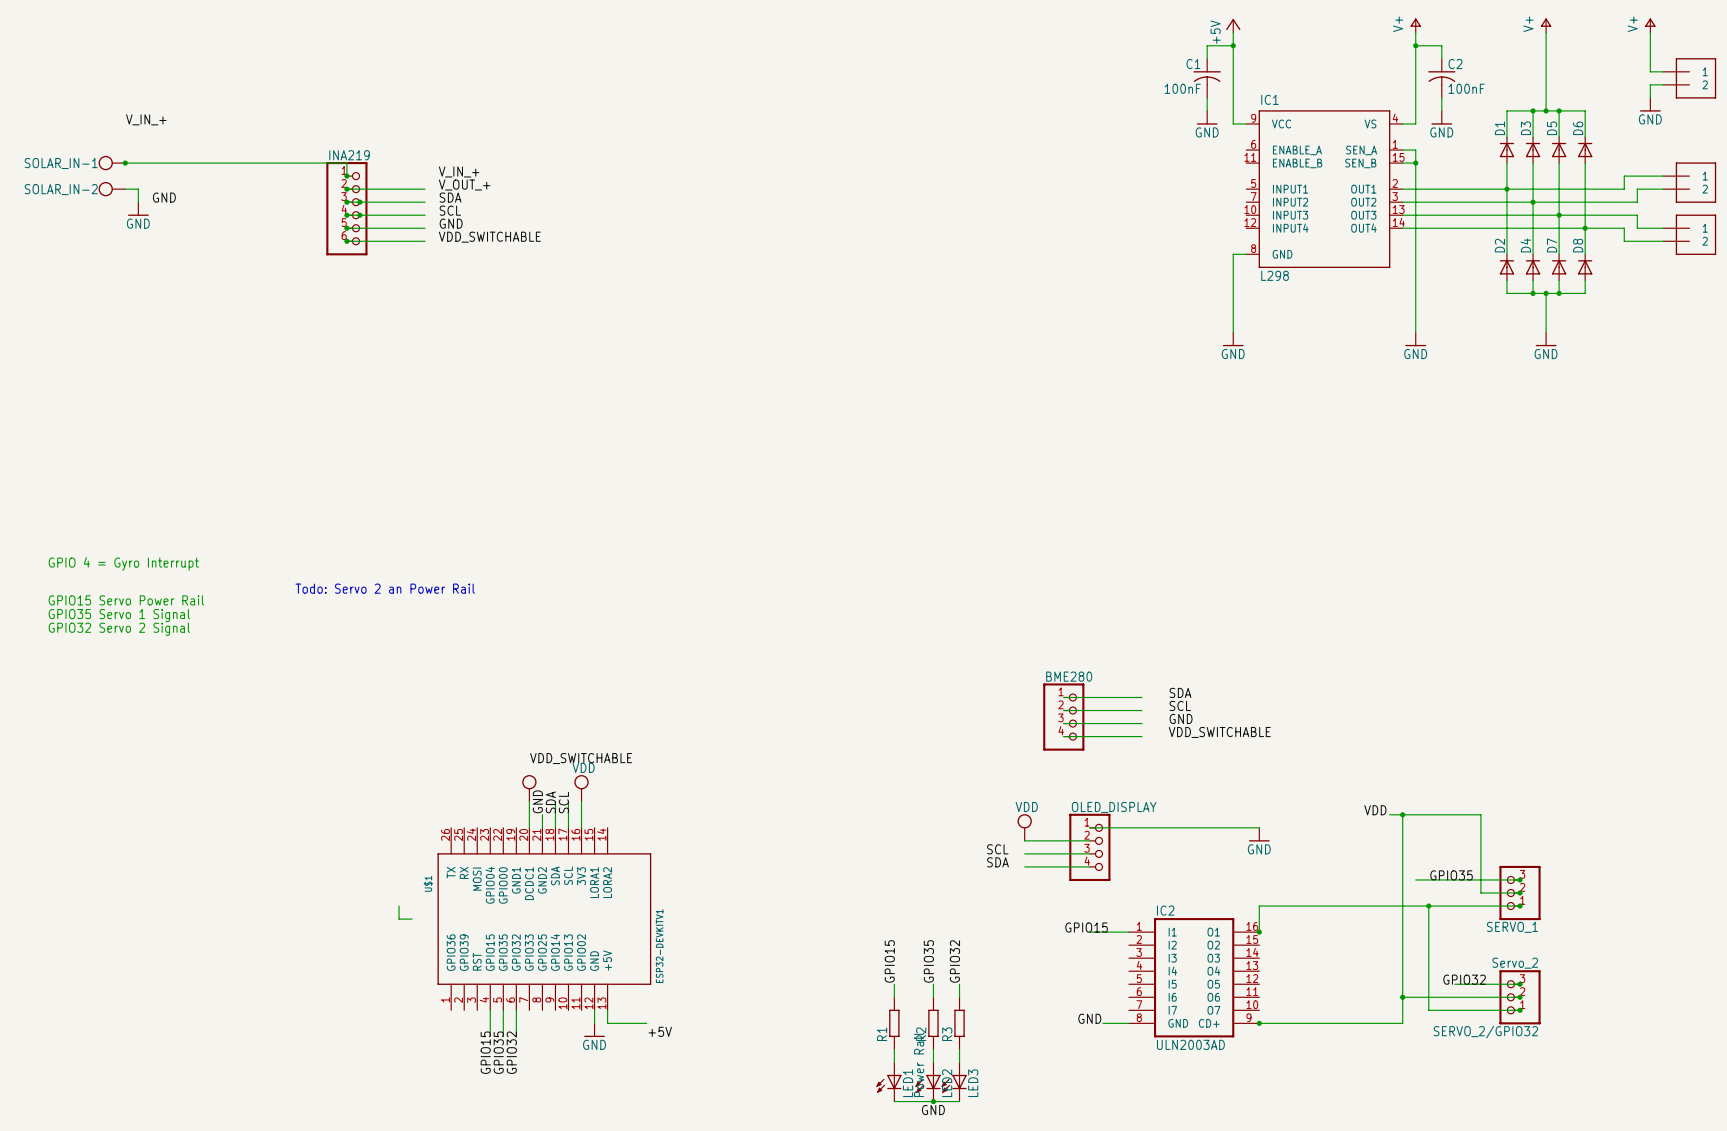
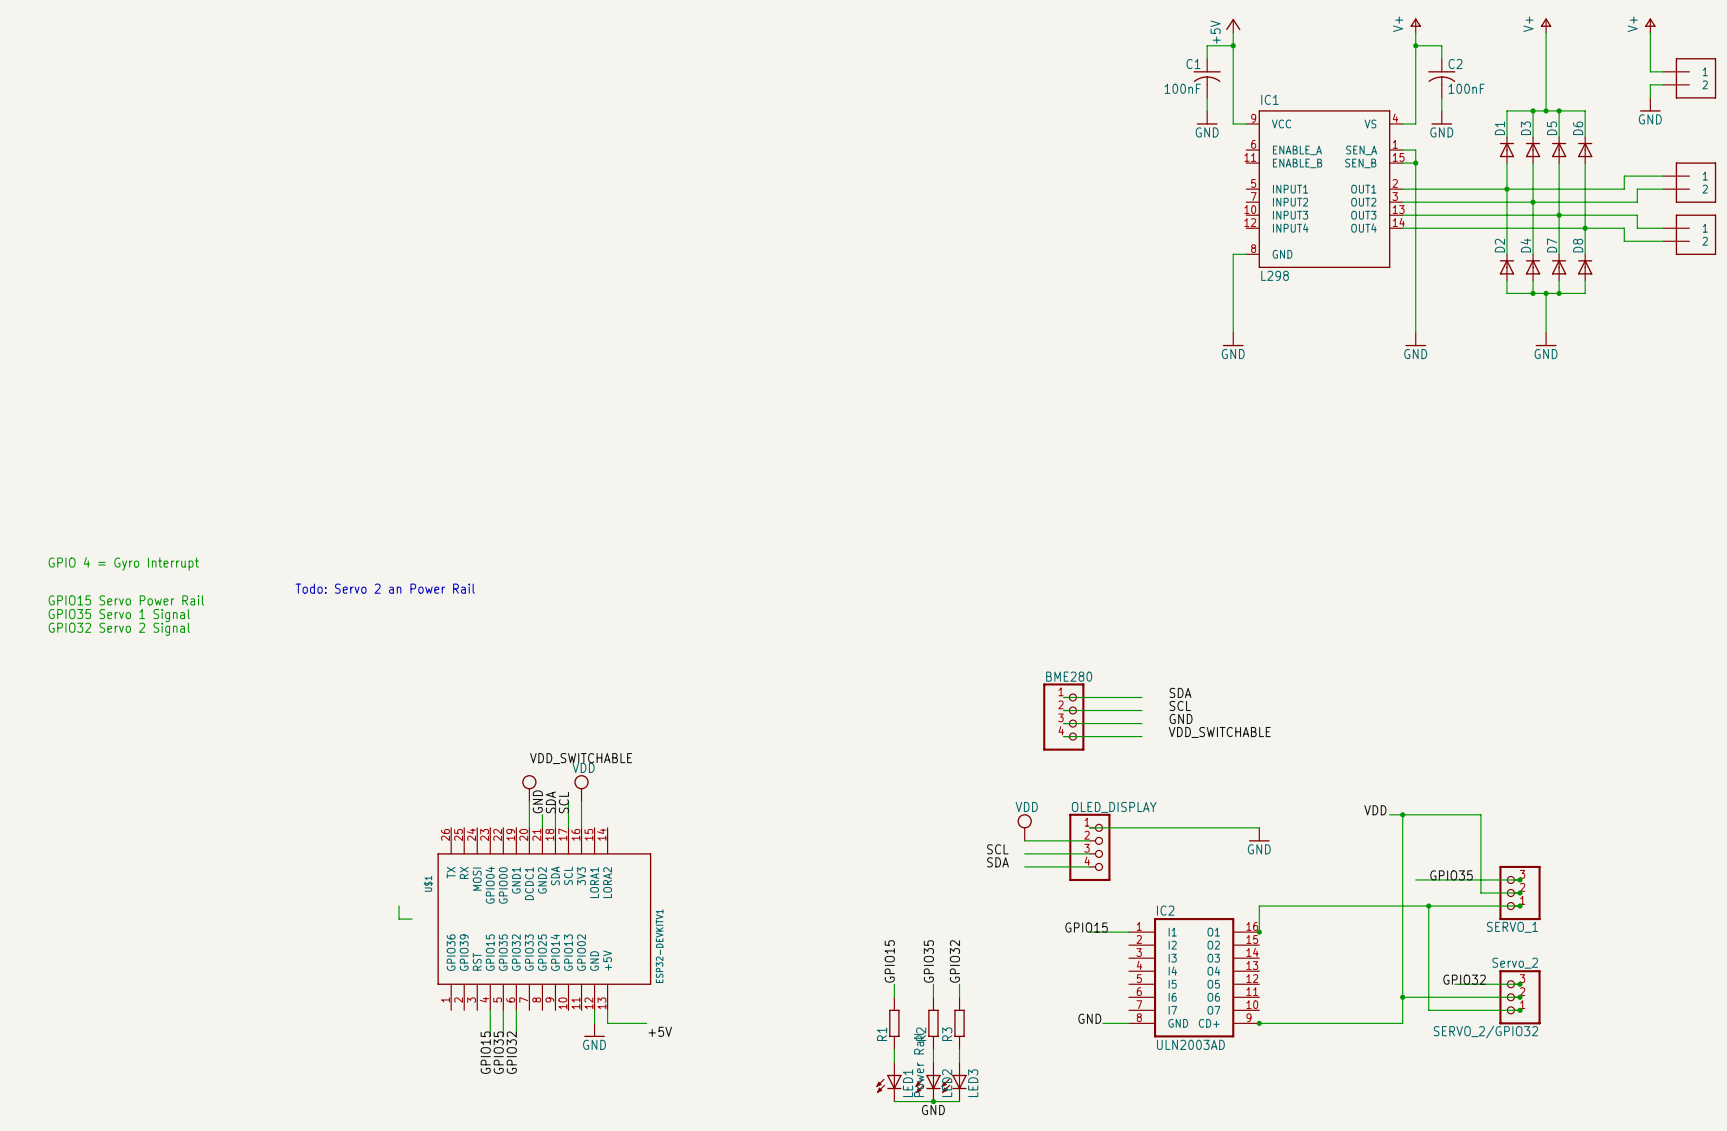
label: V_IN_+ (146, 119) -> none
SOLAR_IN-1: (111, 163) -> none
wire: (125, 163) (346, 163) (346, 176) -> none
junction: (125, 163) -> none
label: V_IN_+ (459, 171) -> none
junction: (346, 176) -> none
label: V_OUT_+ (464, 185) -> none
SOLAR_IN-2: (111, 189) -> none
wire: (125, 189) (138, 189) (138, 202) -> none
wire: (346, 189) (425, 189) -> none
junction: (346, 189) -> none
label: GND (164, 197) -> none
label: SDA (450, 197) -> none
wire: (346, 202) (425, 202) -> none
junction: (346, 202) -> none
junction: (359, 202) -> none
INA219: (346, 208) -> none
power symbol: GND (138, 209) -> none
label: SCL (450, 210) -> none
wire: (346, 215) (425, 215) -> none
junction: (346, 215) -> none
junction: (359, 215) -> none
label: GND (451, 223) -> none
wire: (346, 228) (425, 228) -> none
junction: (346, 228) -> none
label: VDD_SWITCHABLE (489, 237) -> none
wire: (346, 241) (425, 241) -> none
junction: (346, 241) -> none

